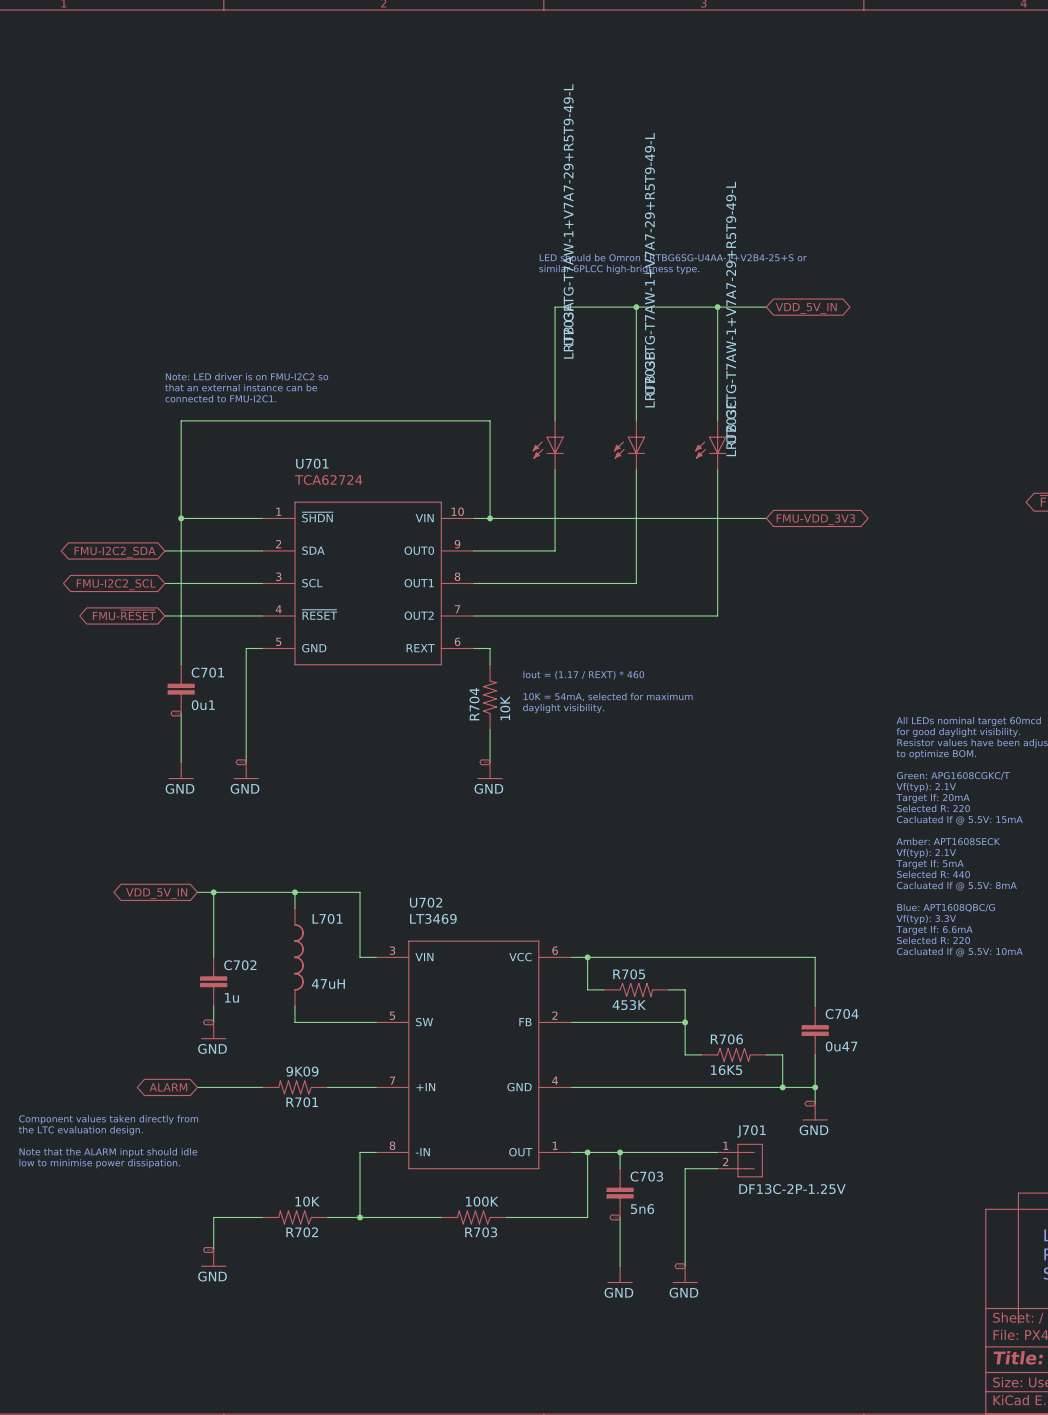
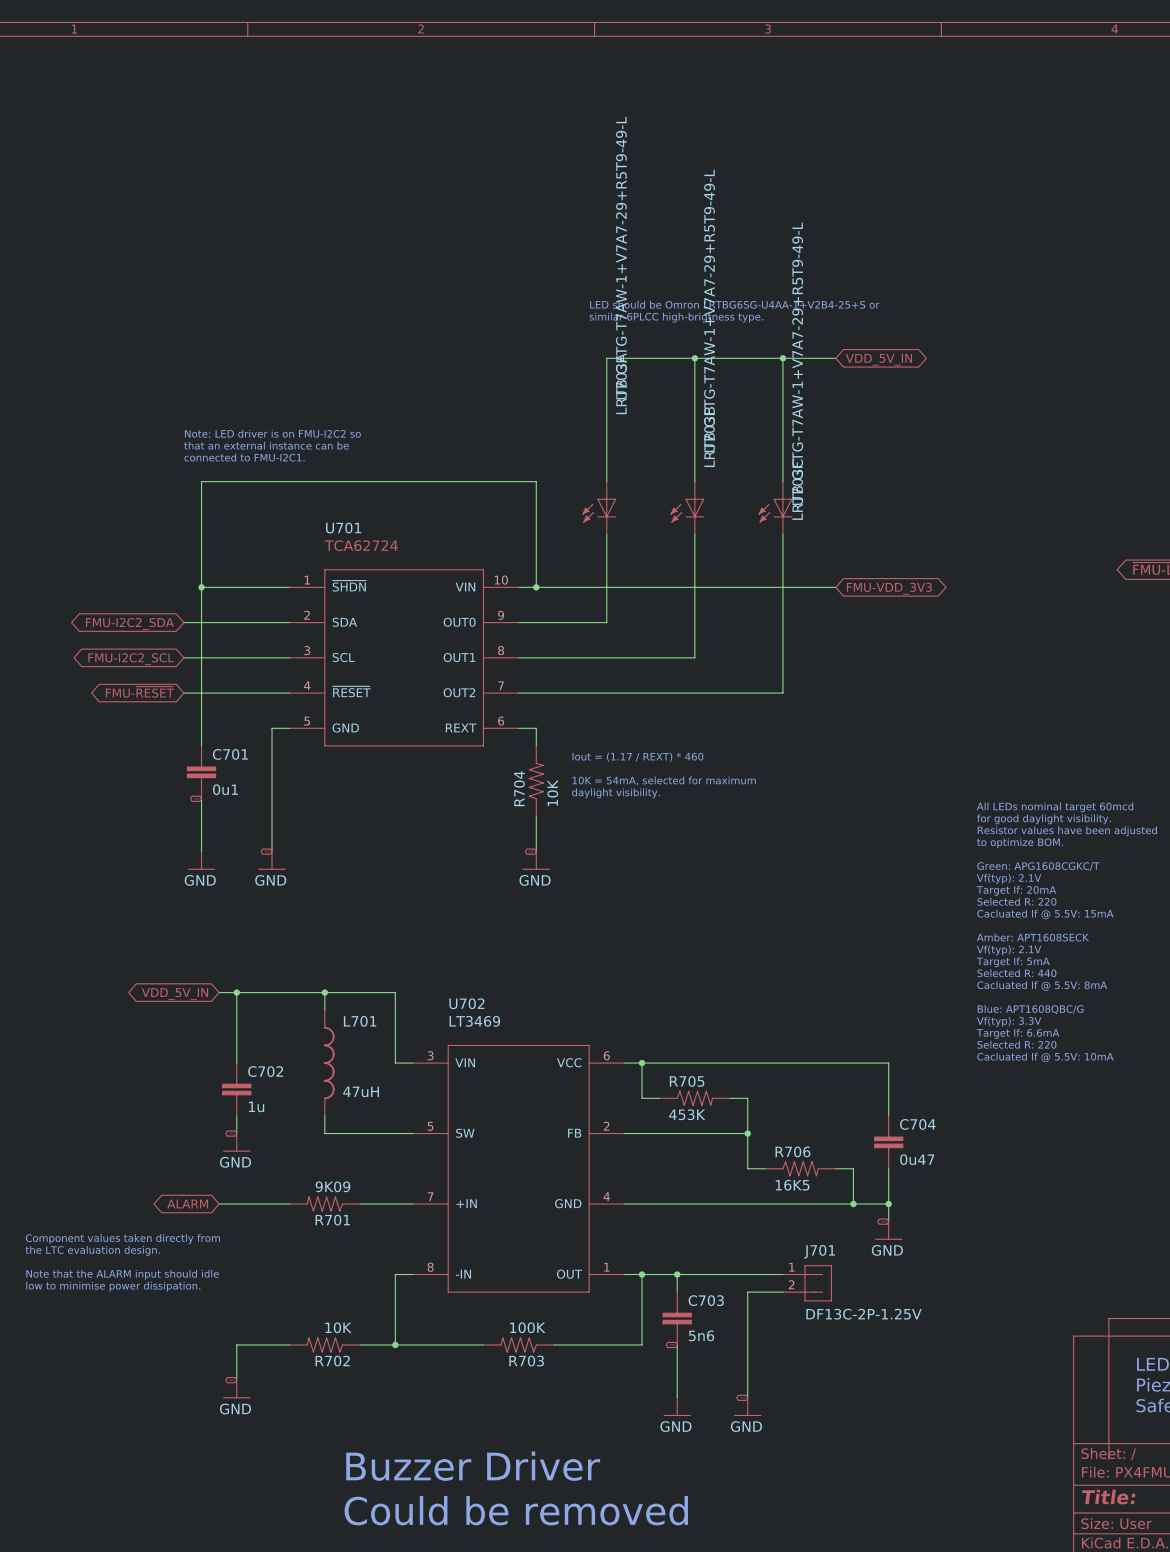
text: none -> Buzzer Driver (473, 1466)
text: none -> Could be removed (516, 1510)

